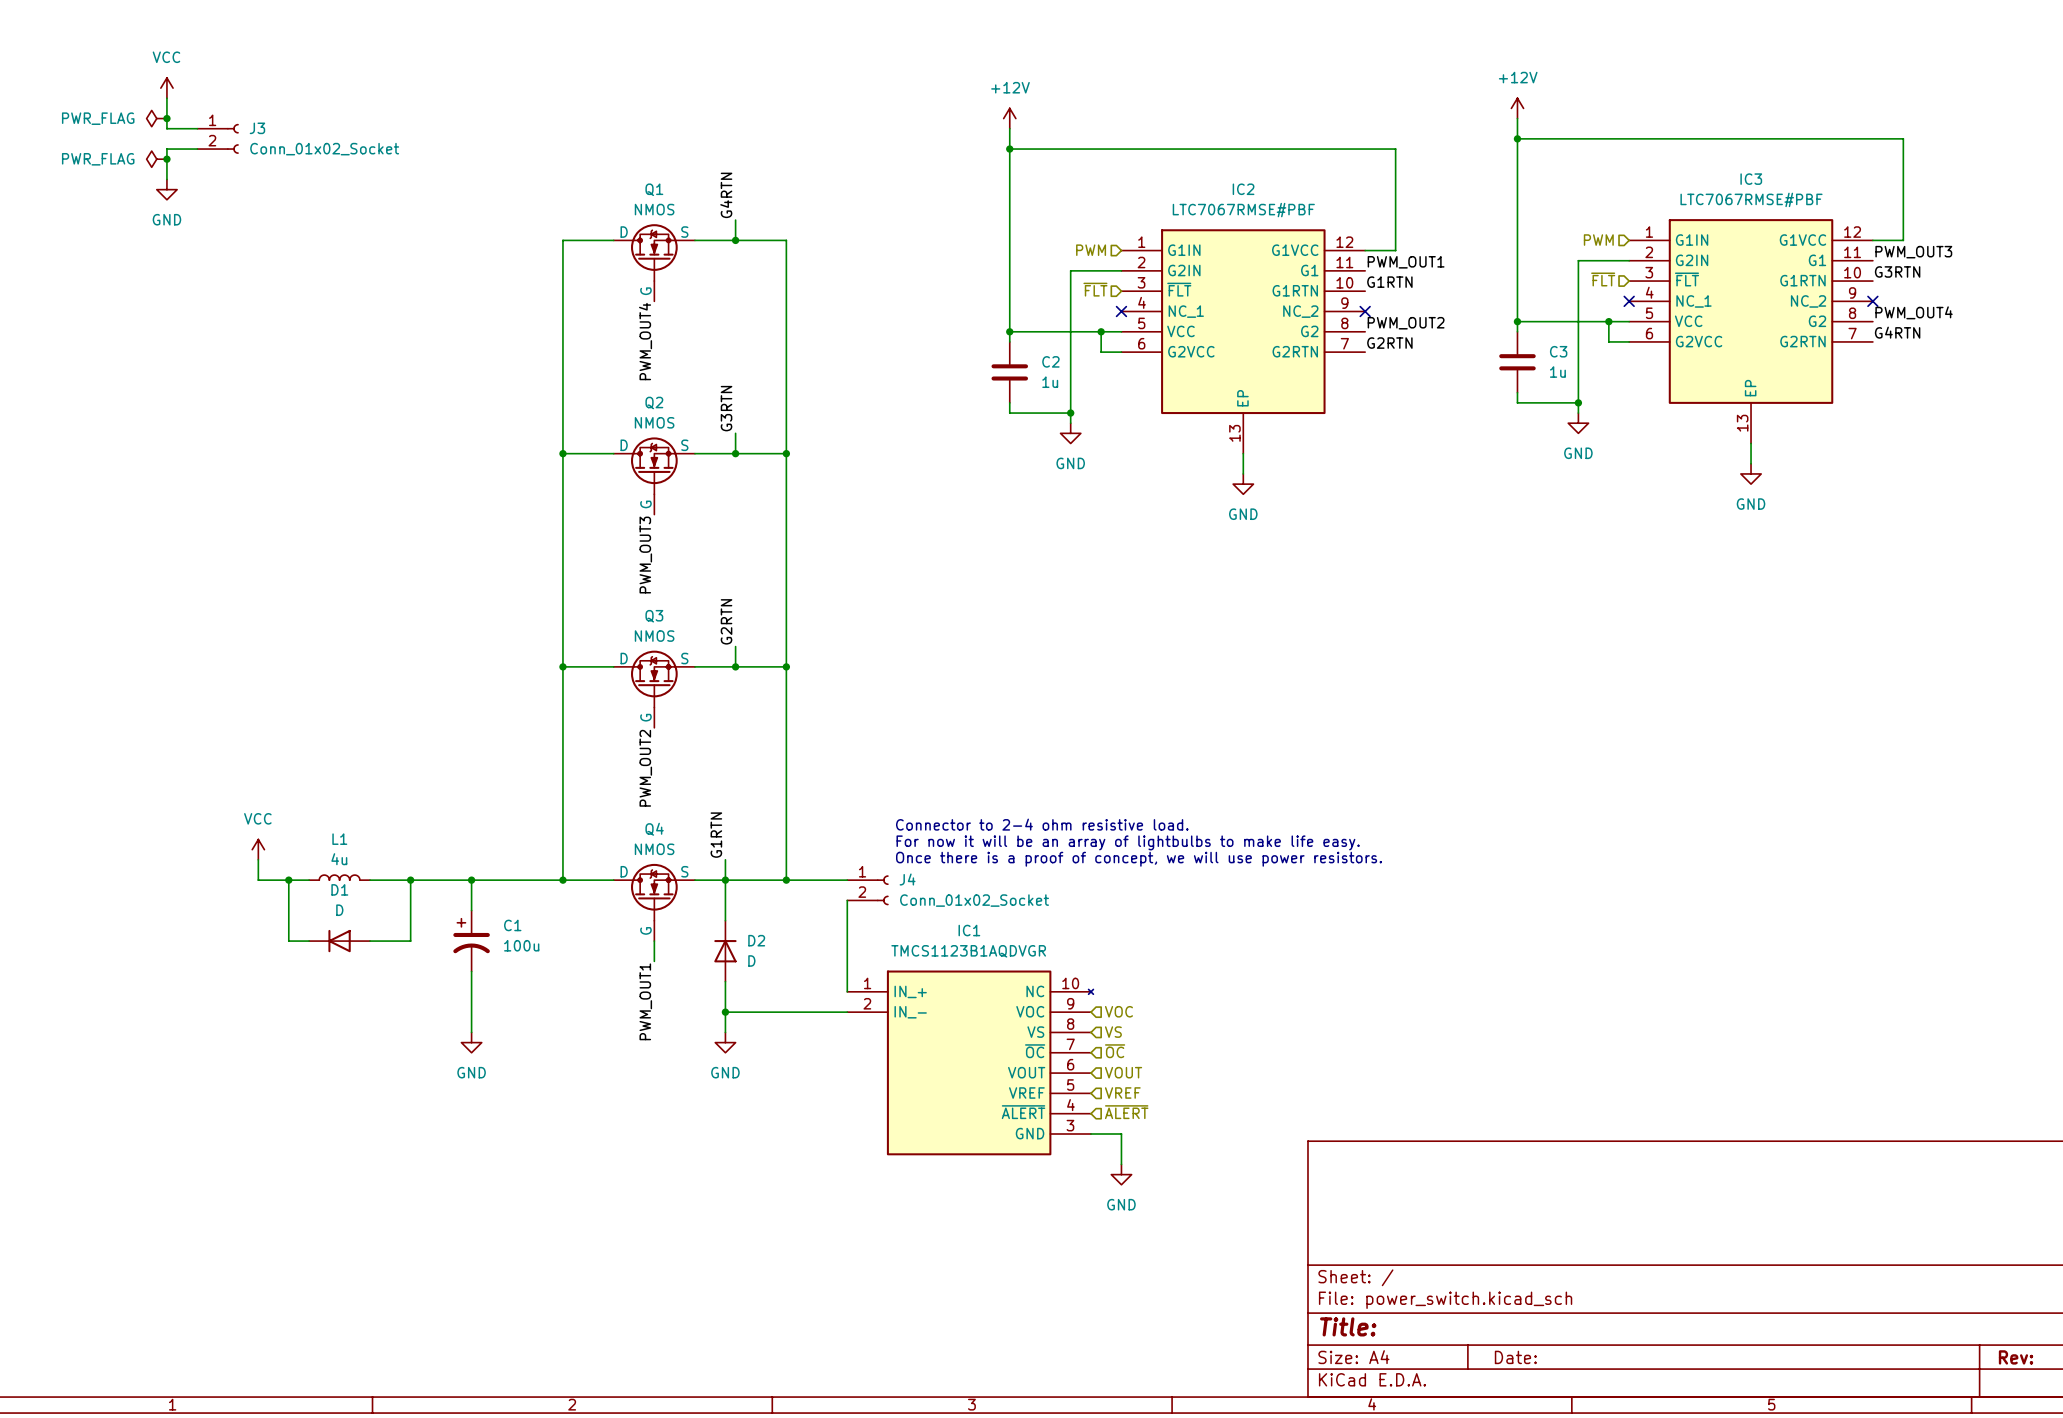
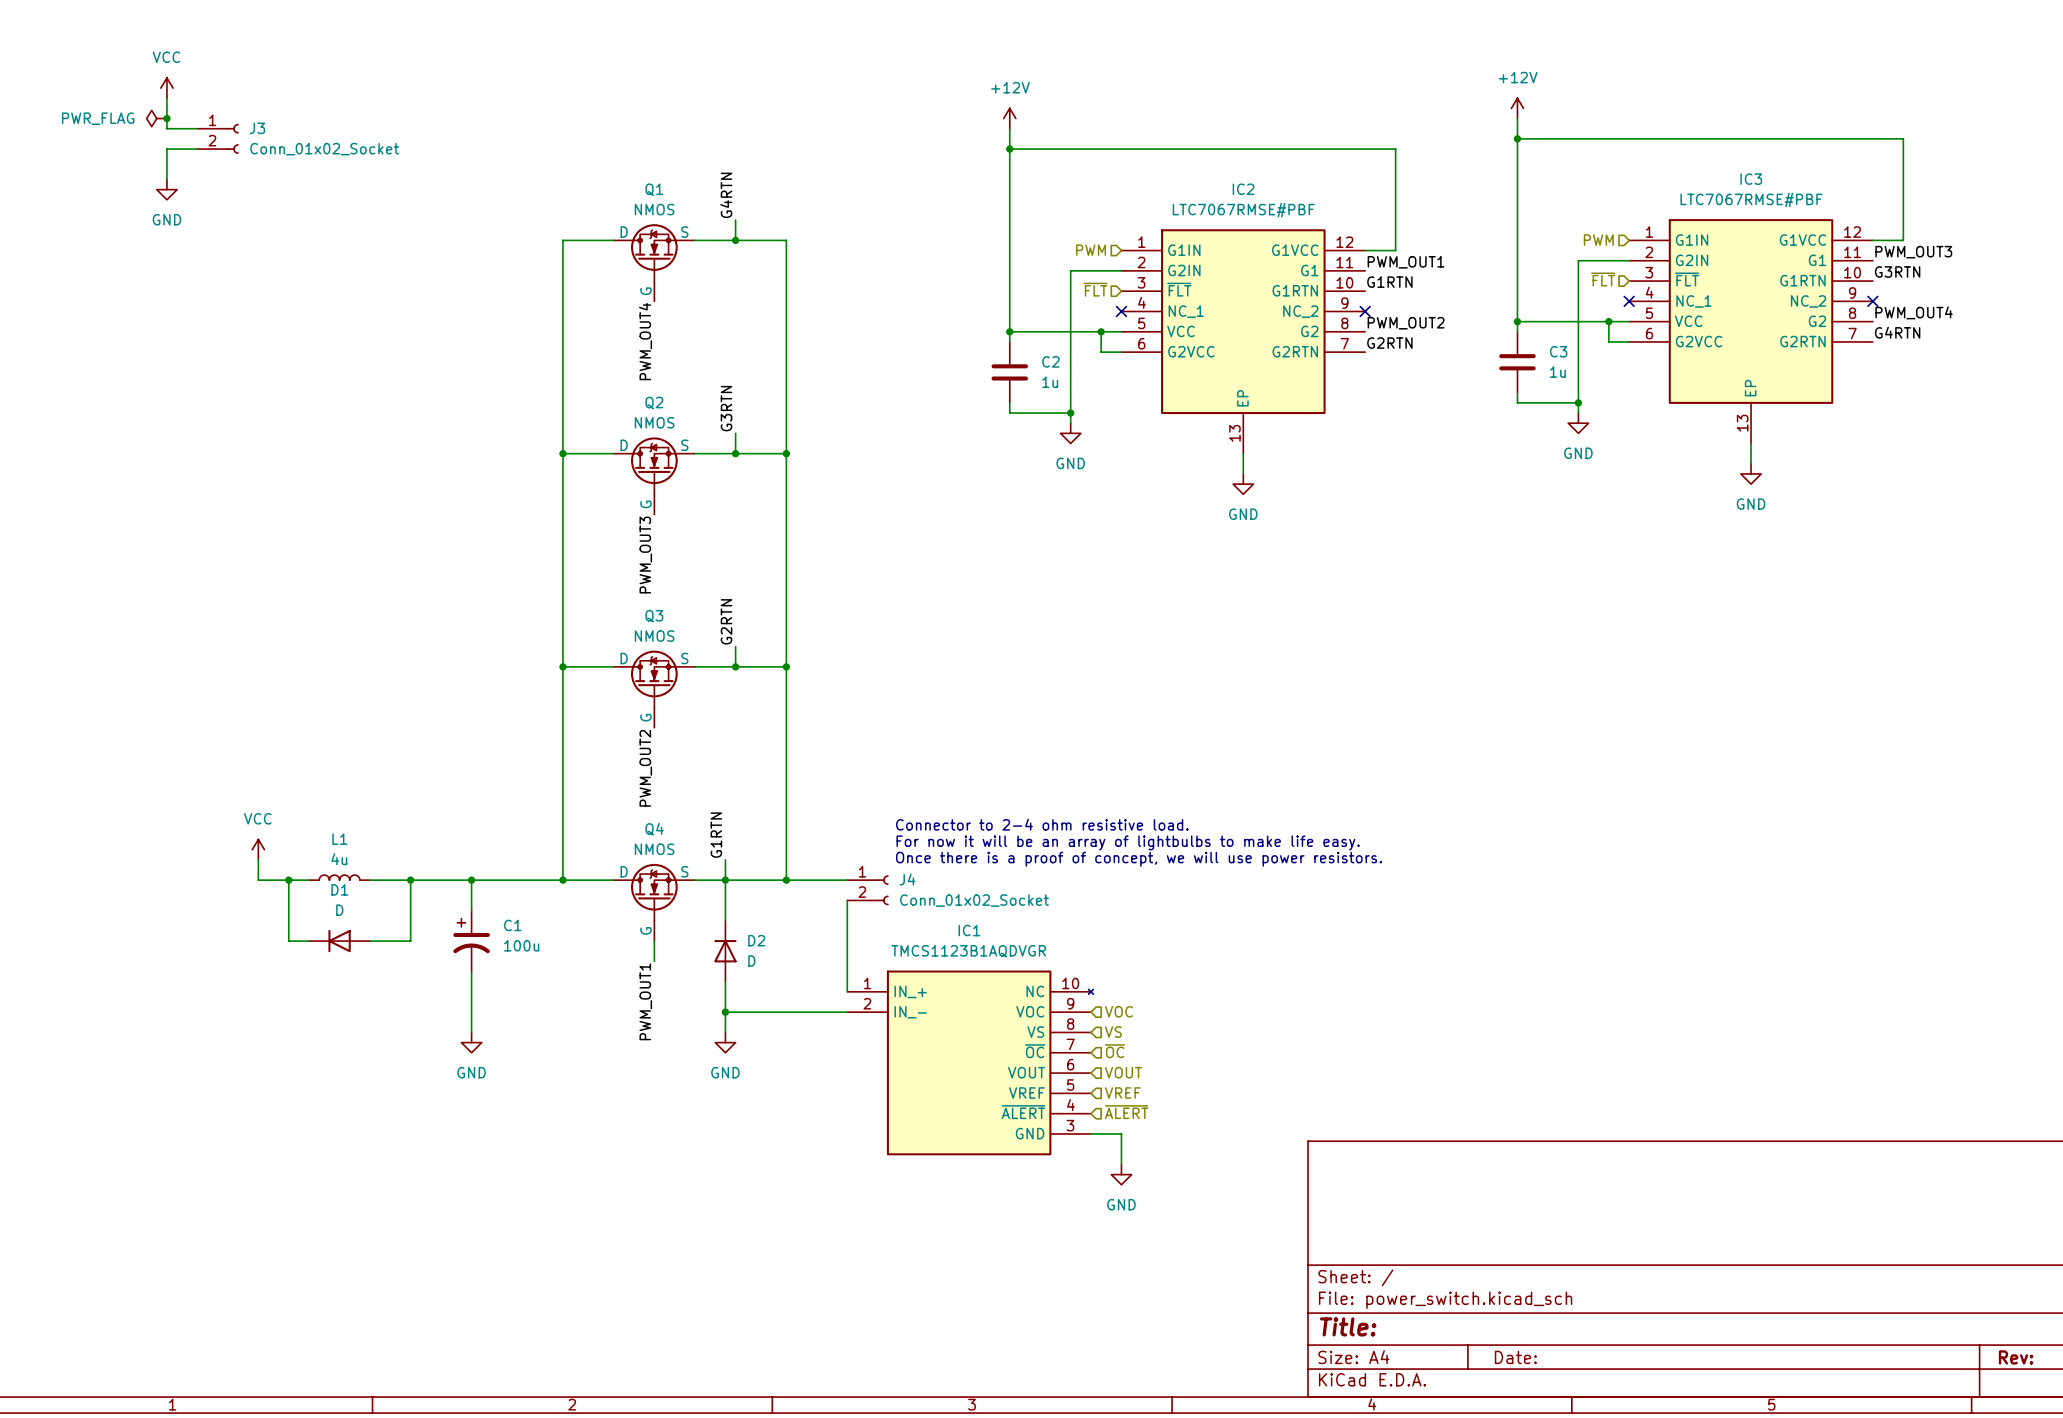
power symbol: PWR_FLAG (156, 159) -> none
junction: (166, 159) -> none

